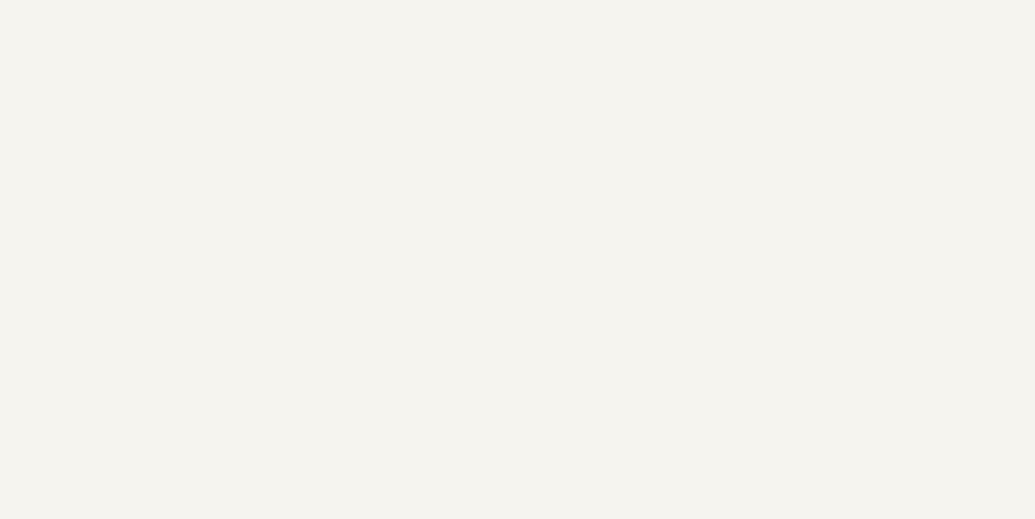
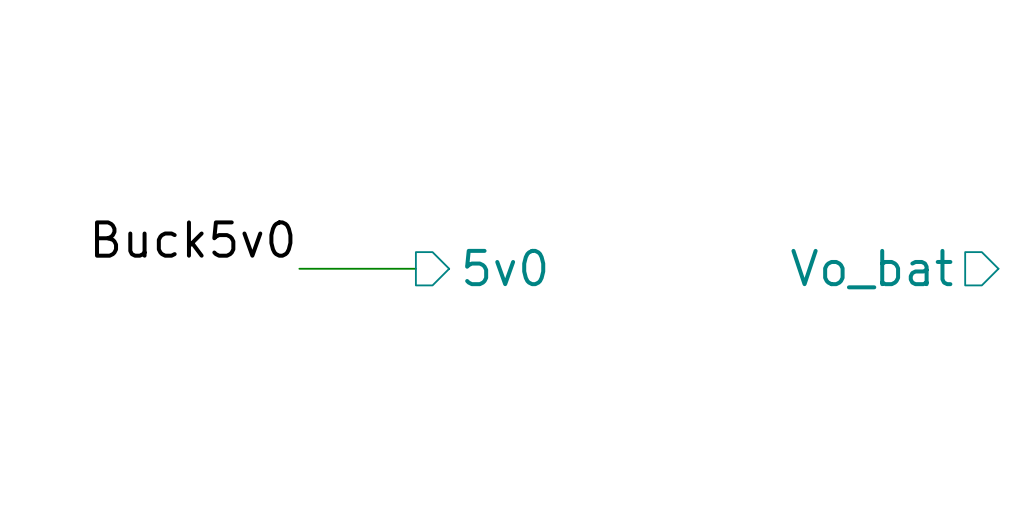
label: none -> Buck5v0 (193, 239)
sheet pin: none -> 5v0 (505, 267)
wire: none -> (299, 268) (415, 268)
sheet pin: none -> Vo_bat (871, 269)

